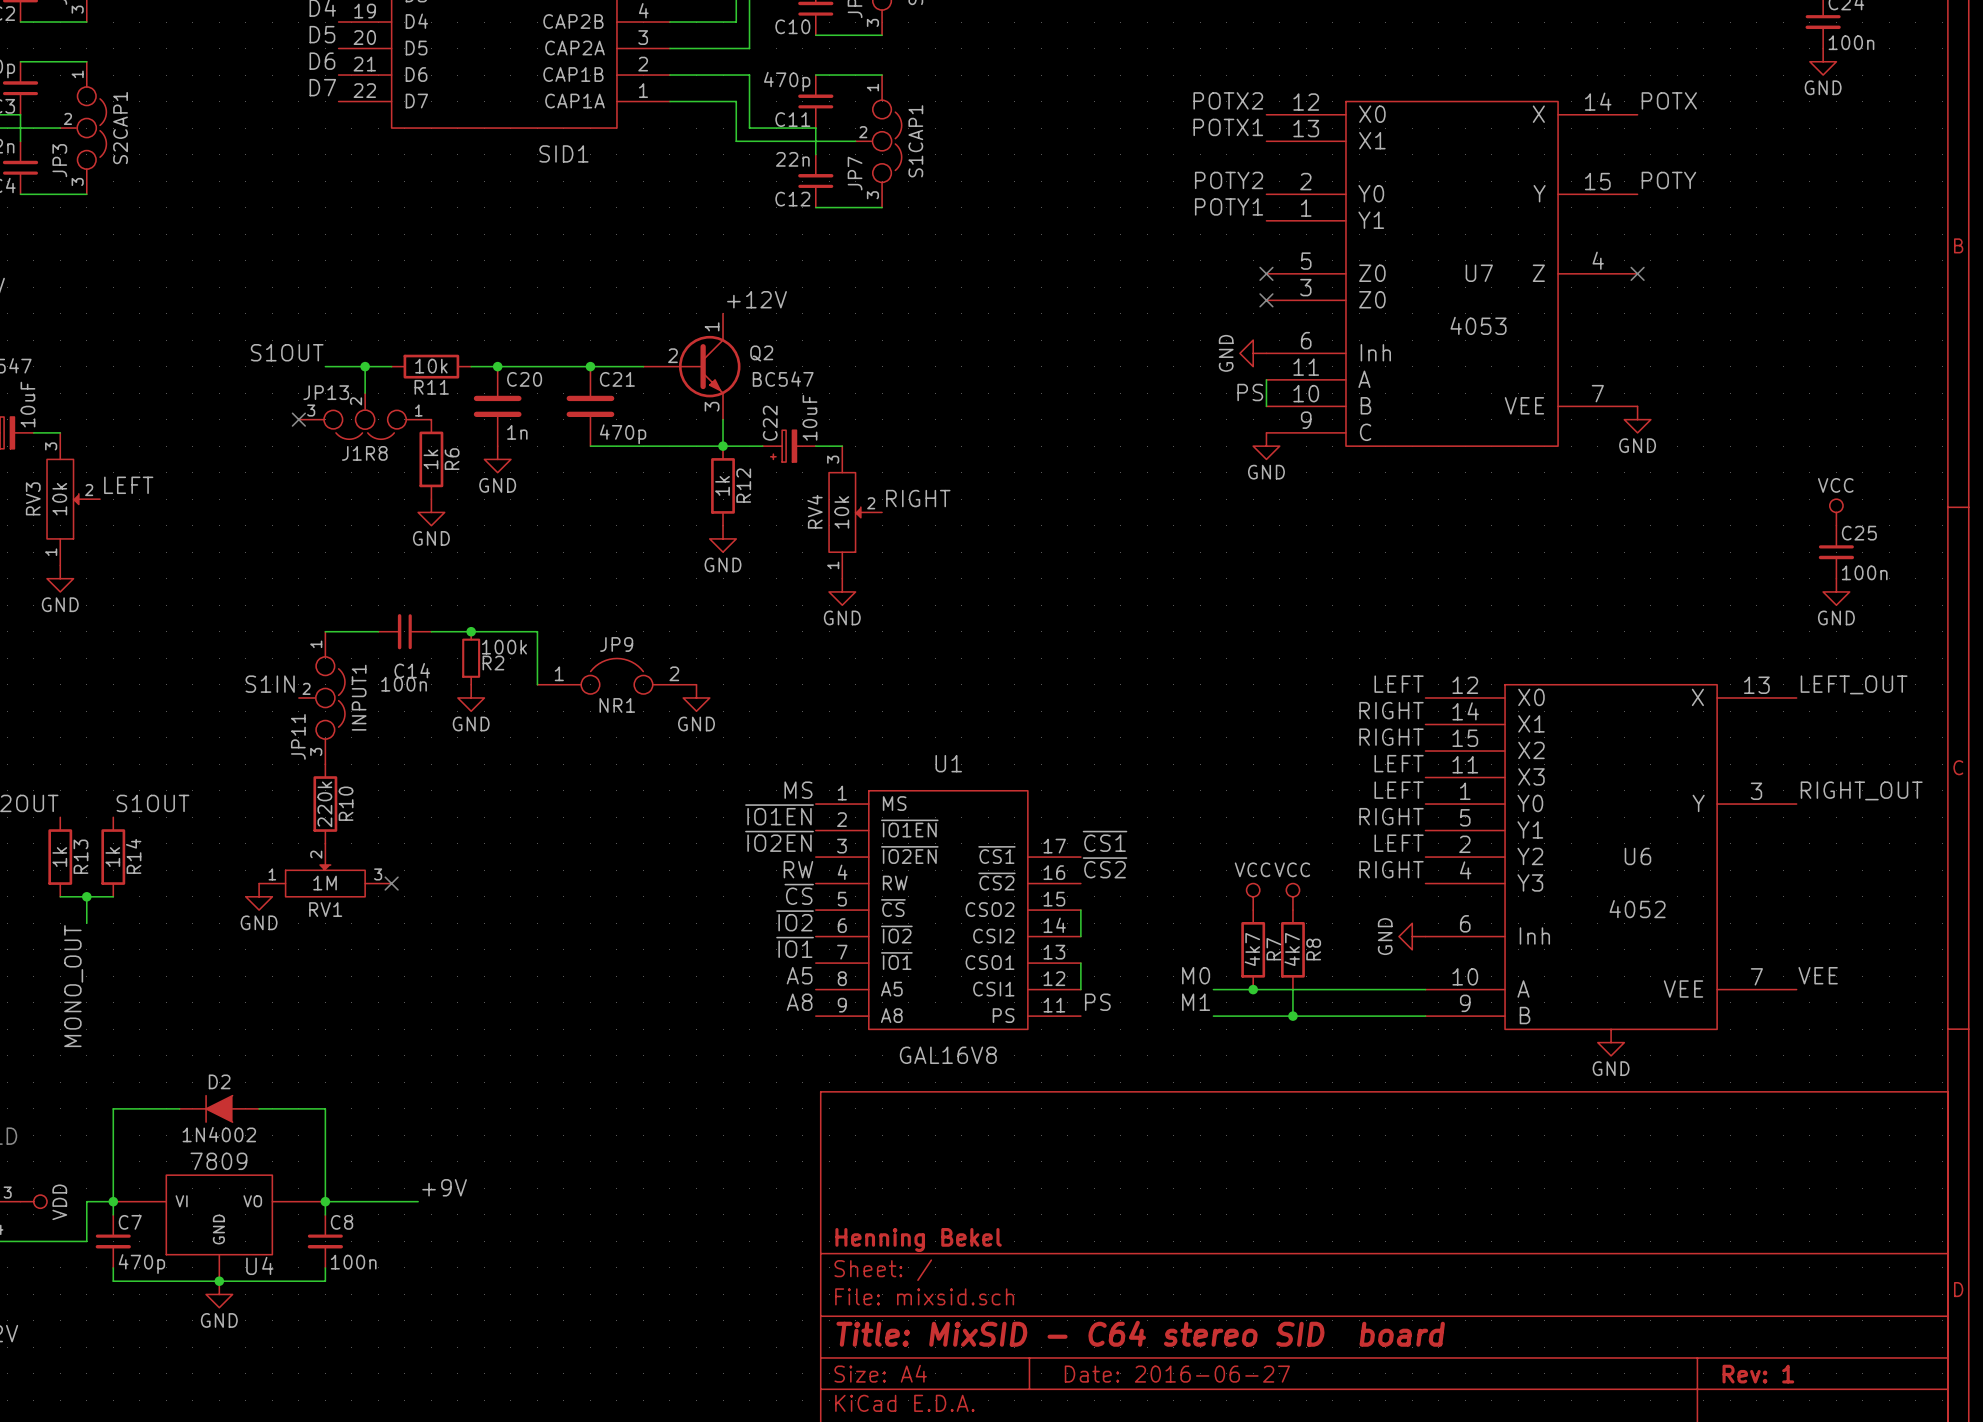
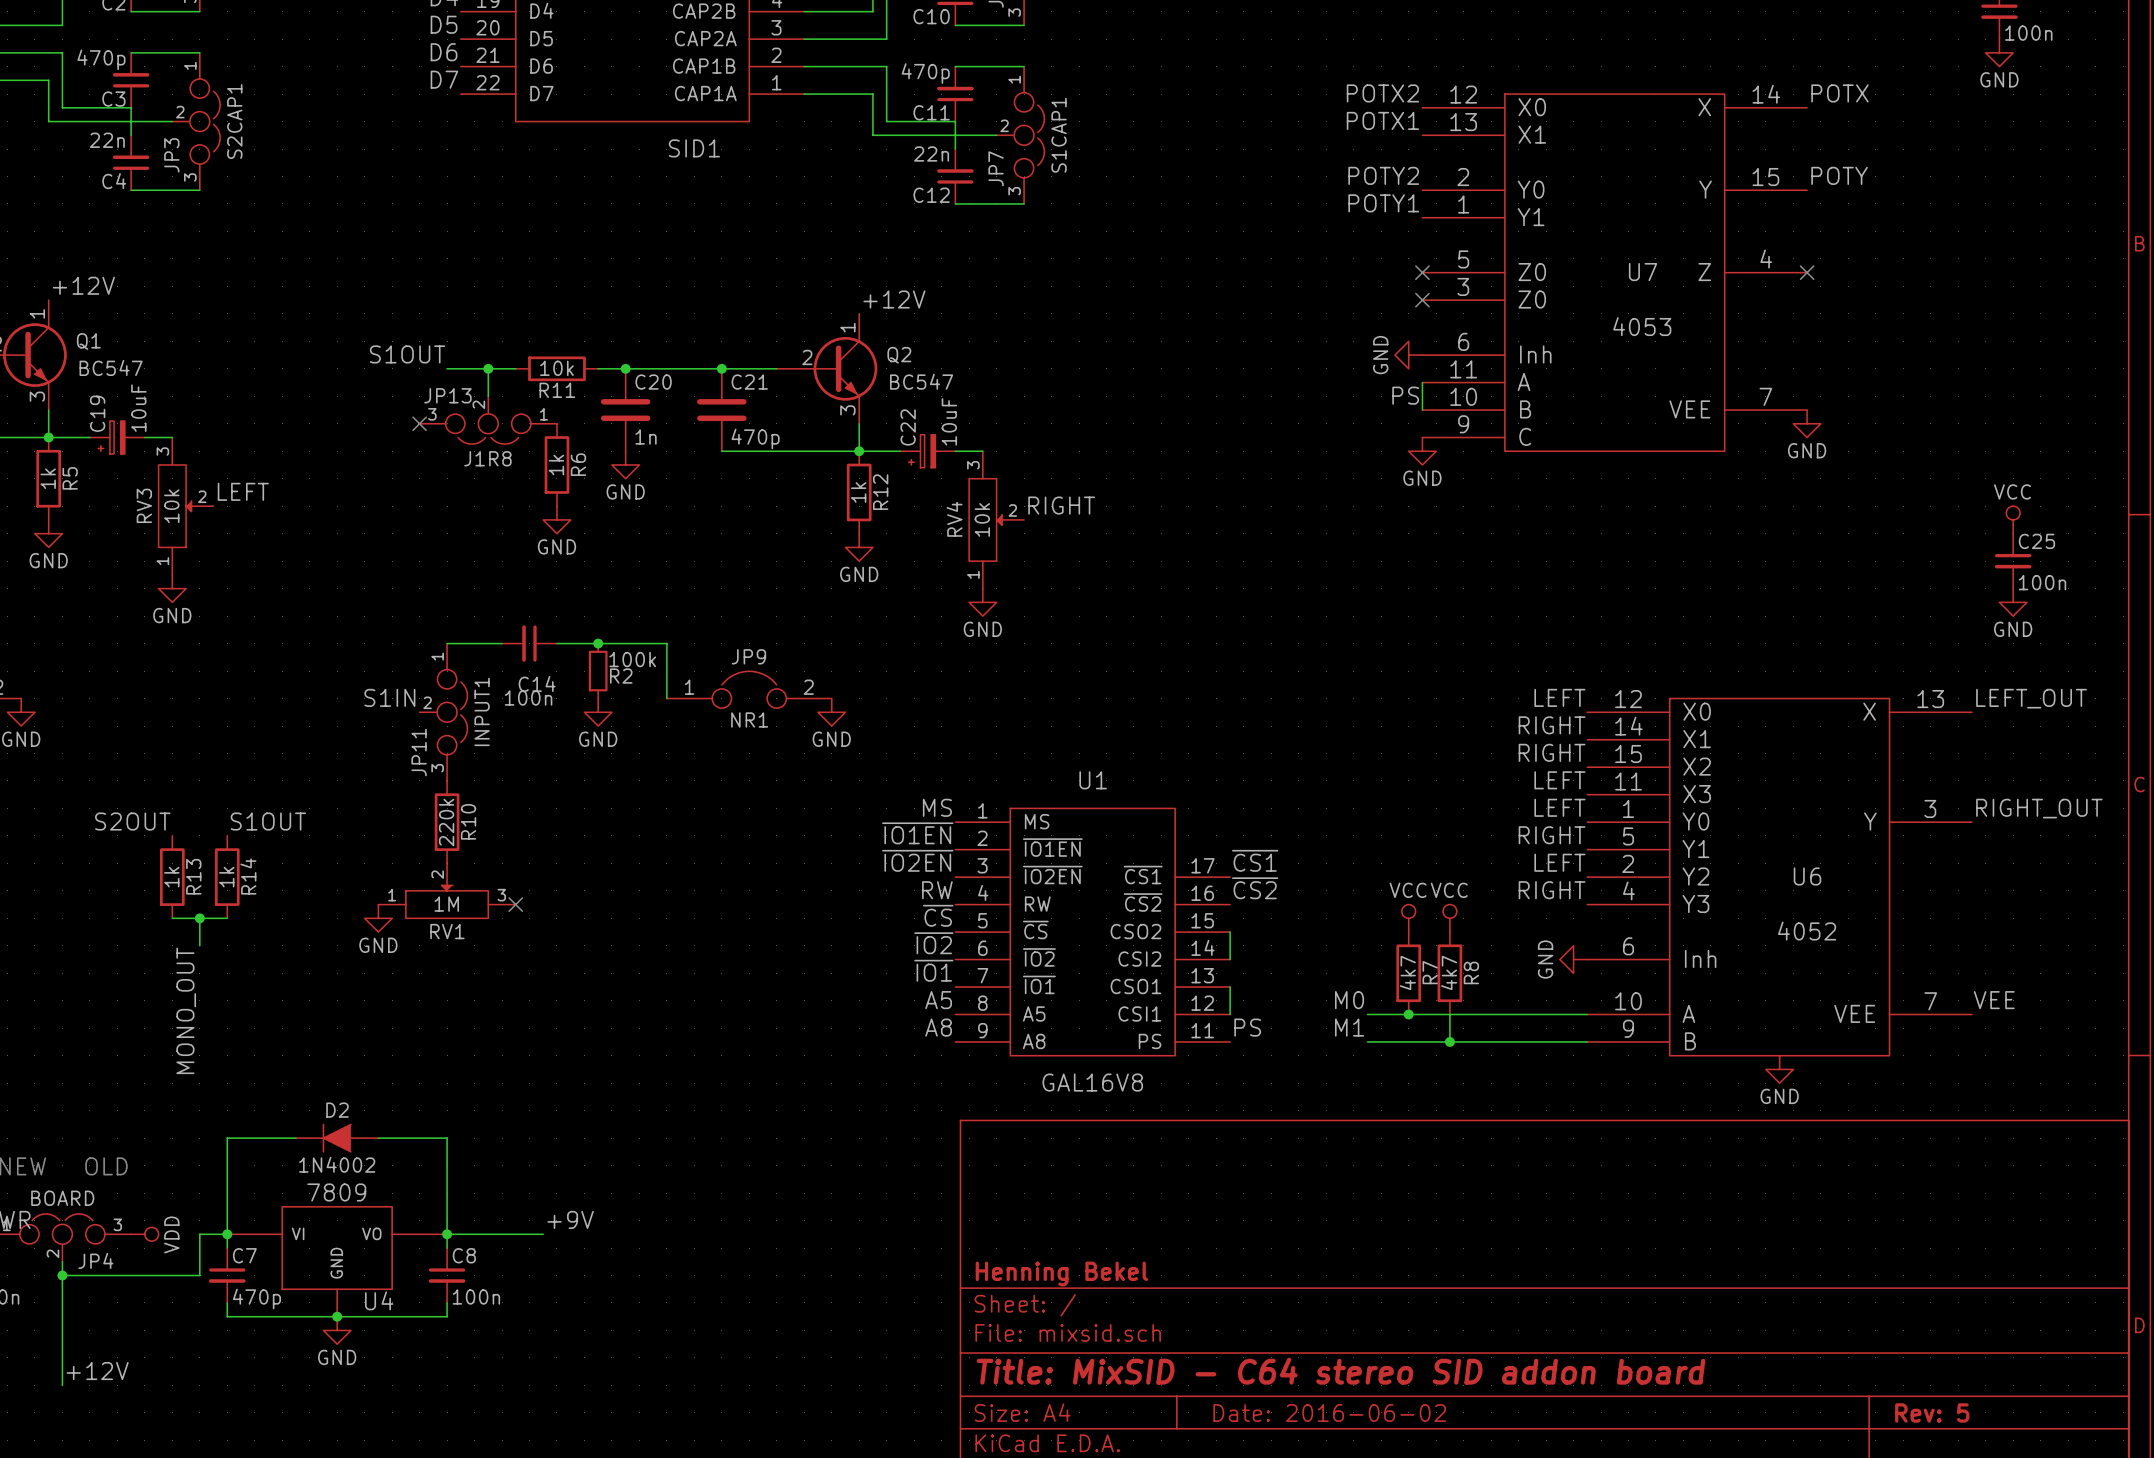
title block: Title: MixSID - C64 stereo SID board (1140, 1333) -> Title: MixSID - C64 stereo SID addon board (1341, 1371)
title block: Date: 2016-06-27 (1177, 1374) -> Date: 2016-06-02 (1329, 1413)
title block: Rev: 1 (1758, 1374) -> Rev: 5 (1932, 1413)

